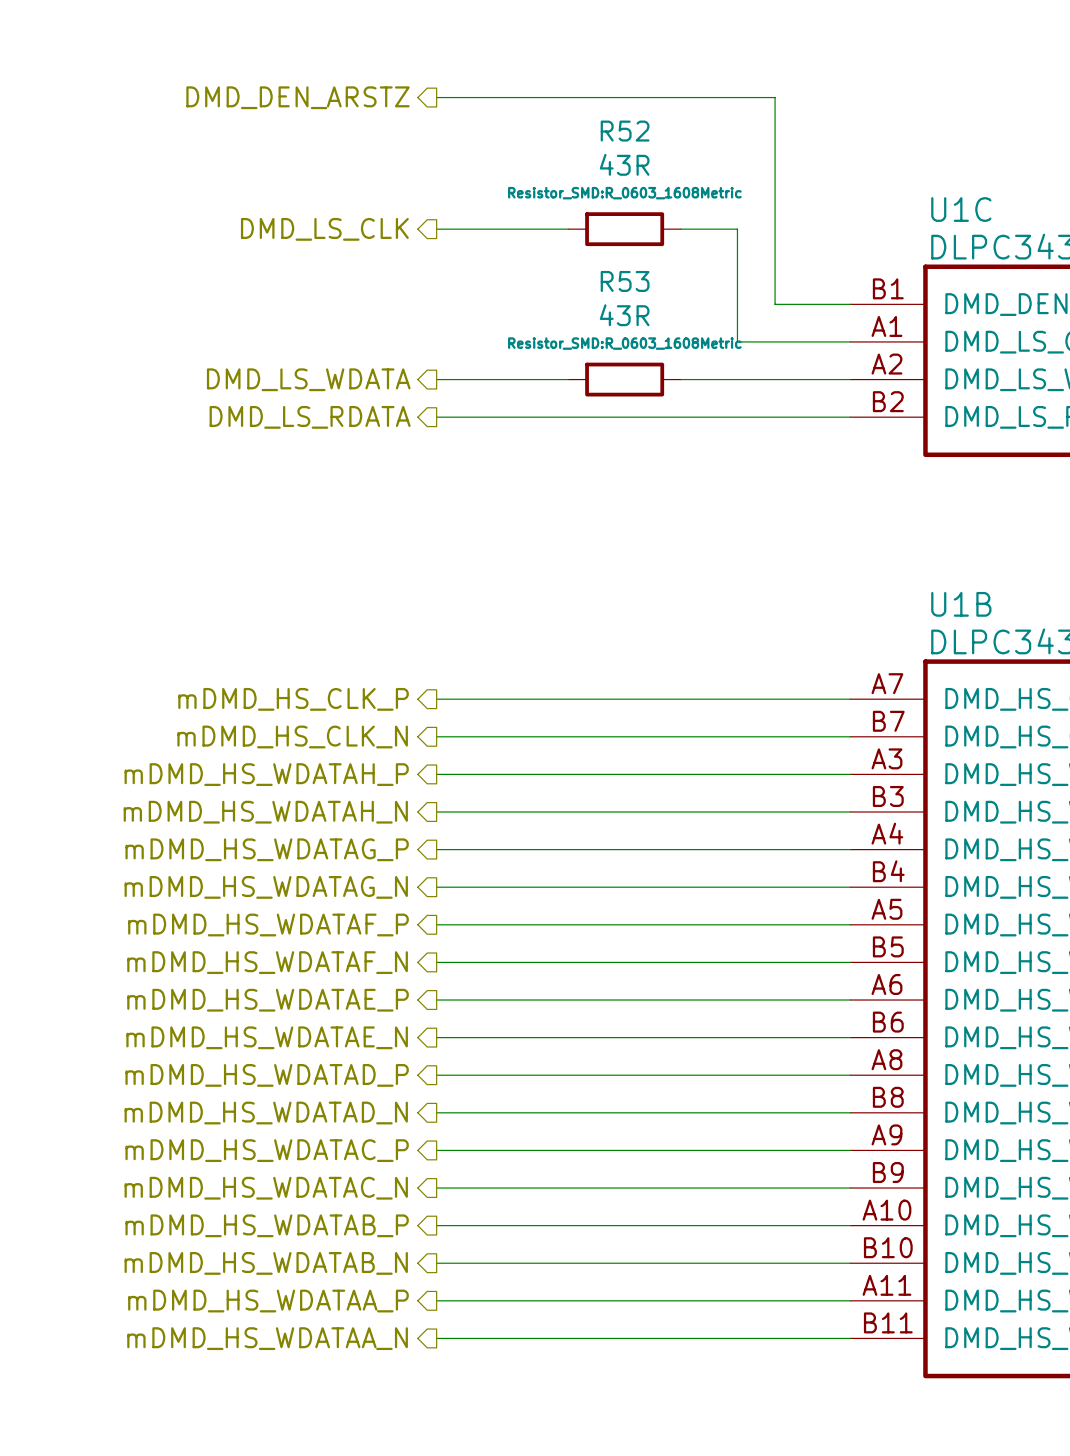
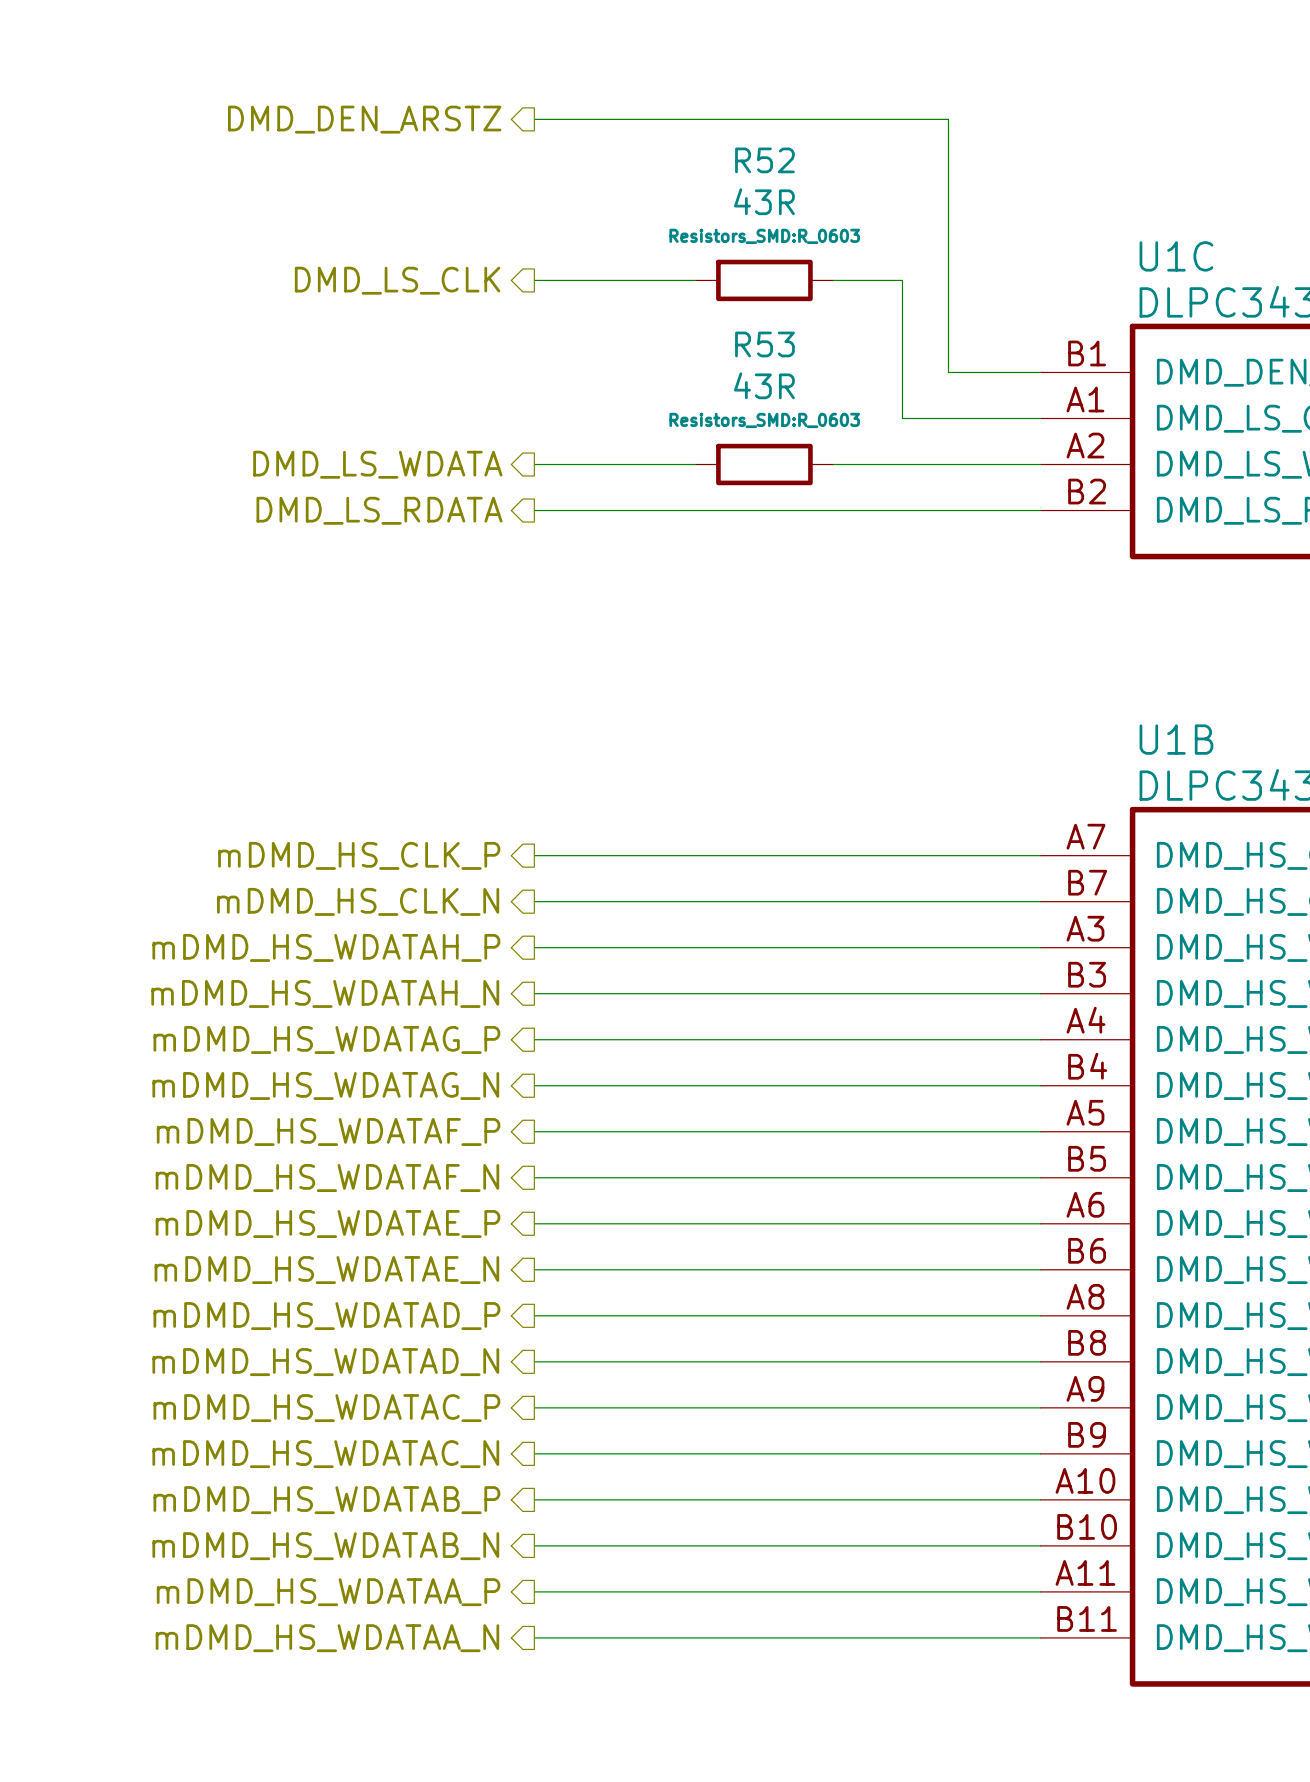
R52 text: Resistor_SMD:R_0603_1608Metric (624, 193) -> Resistors_SMD:R_0603 (764, 236)
R53 text: Resistor_SMD:R_0603_1608Metric (624, 343) -> Resistors_SMD:R_0603 (764, 420)

